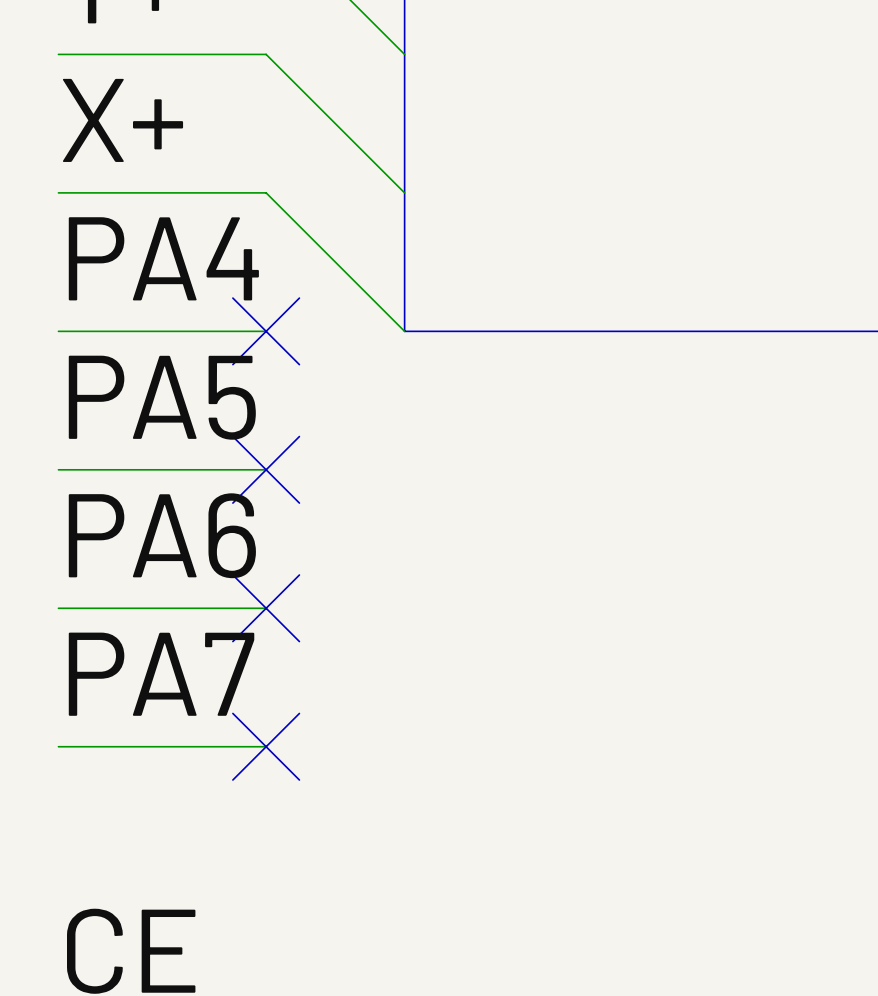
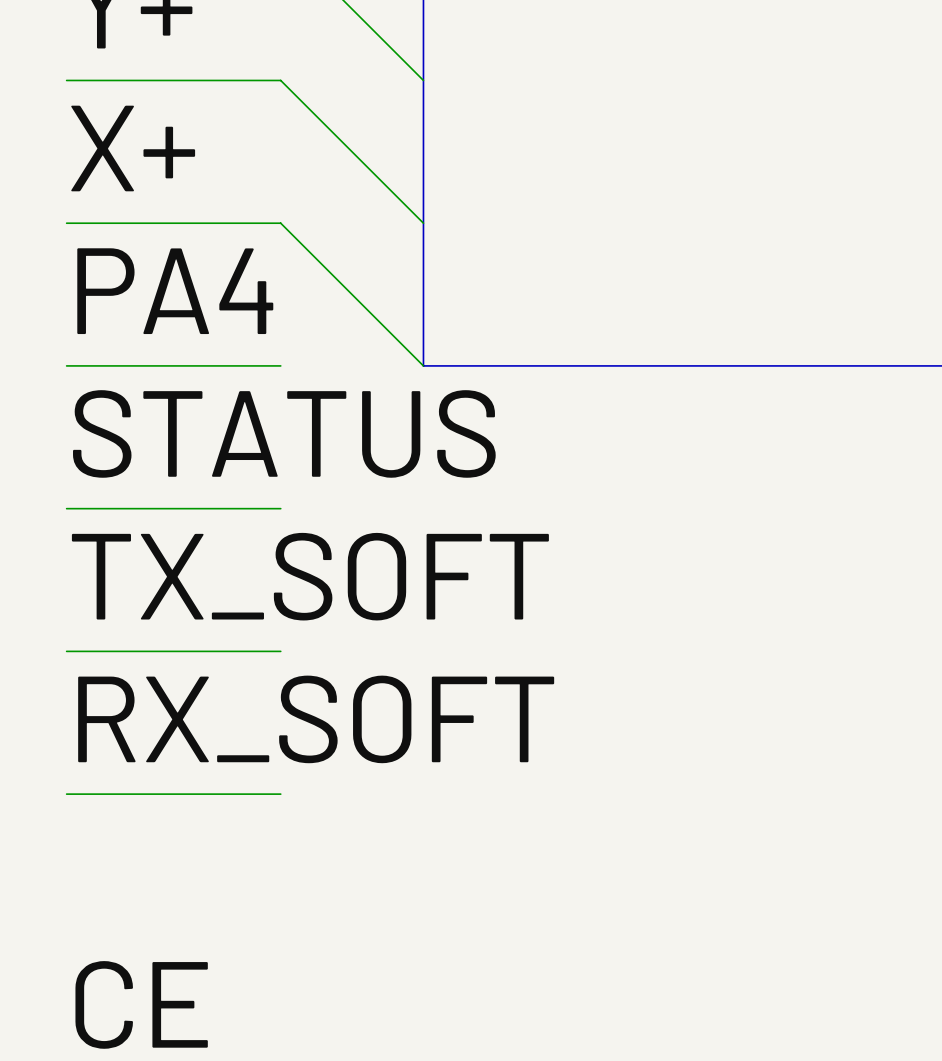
no-connect mark: (266, 331) -> none
label: PA5 (162, 397) -> STATUS (284, 433)
no-connect mark: (266, 469) -> none
label: PA6 (162, 535) -> TX_SOFT (310, 576)
no-connect mark: (266, 608) -> none
label: PA7 (161, 674) -> RX_SOFT (316, 719)
no-connect mark: (266, 746) -> none

